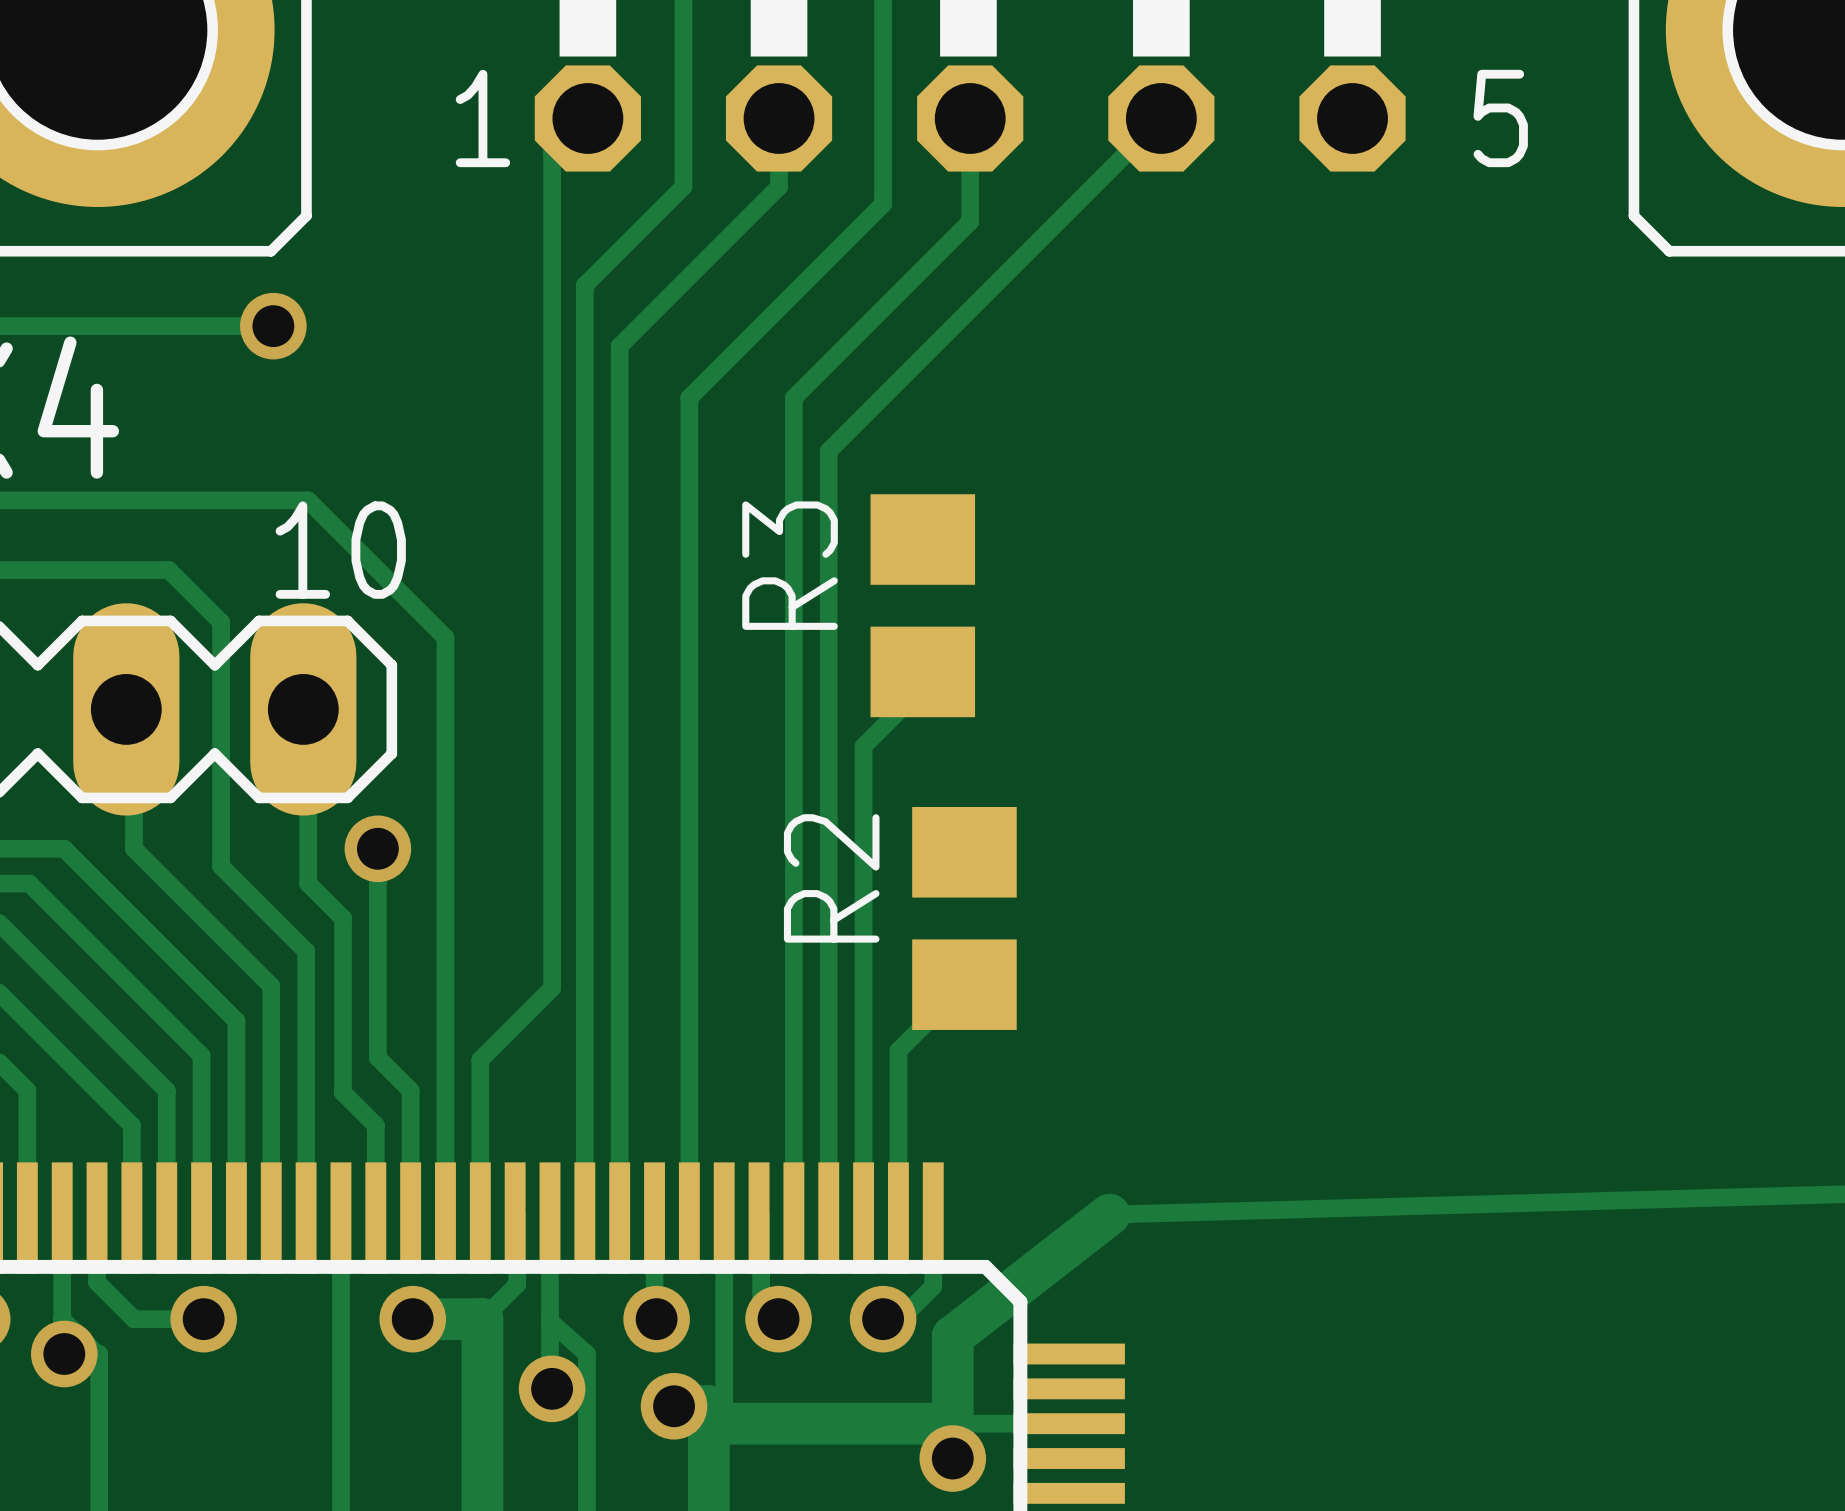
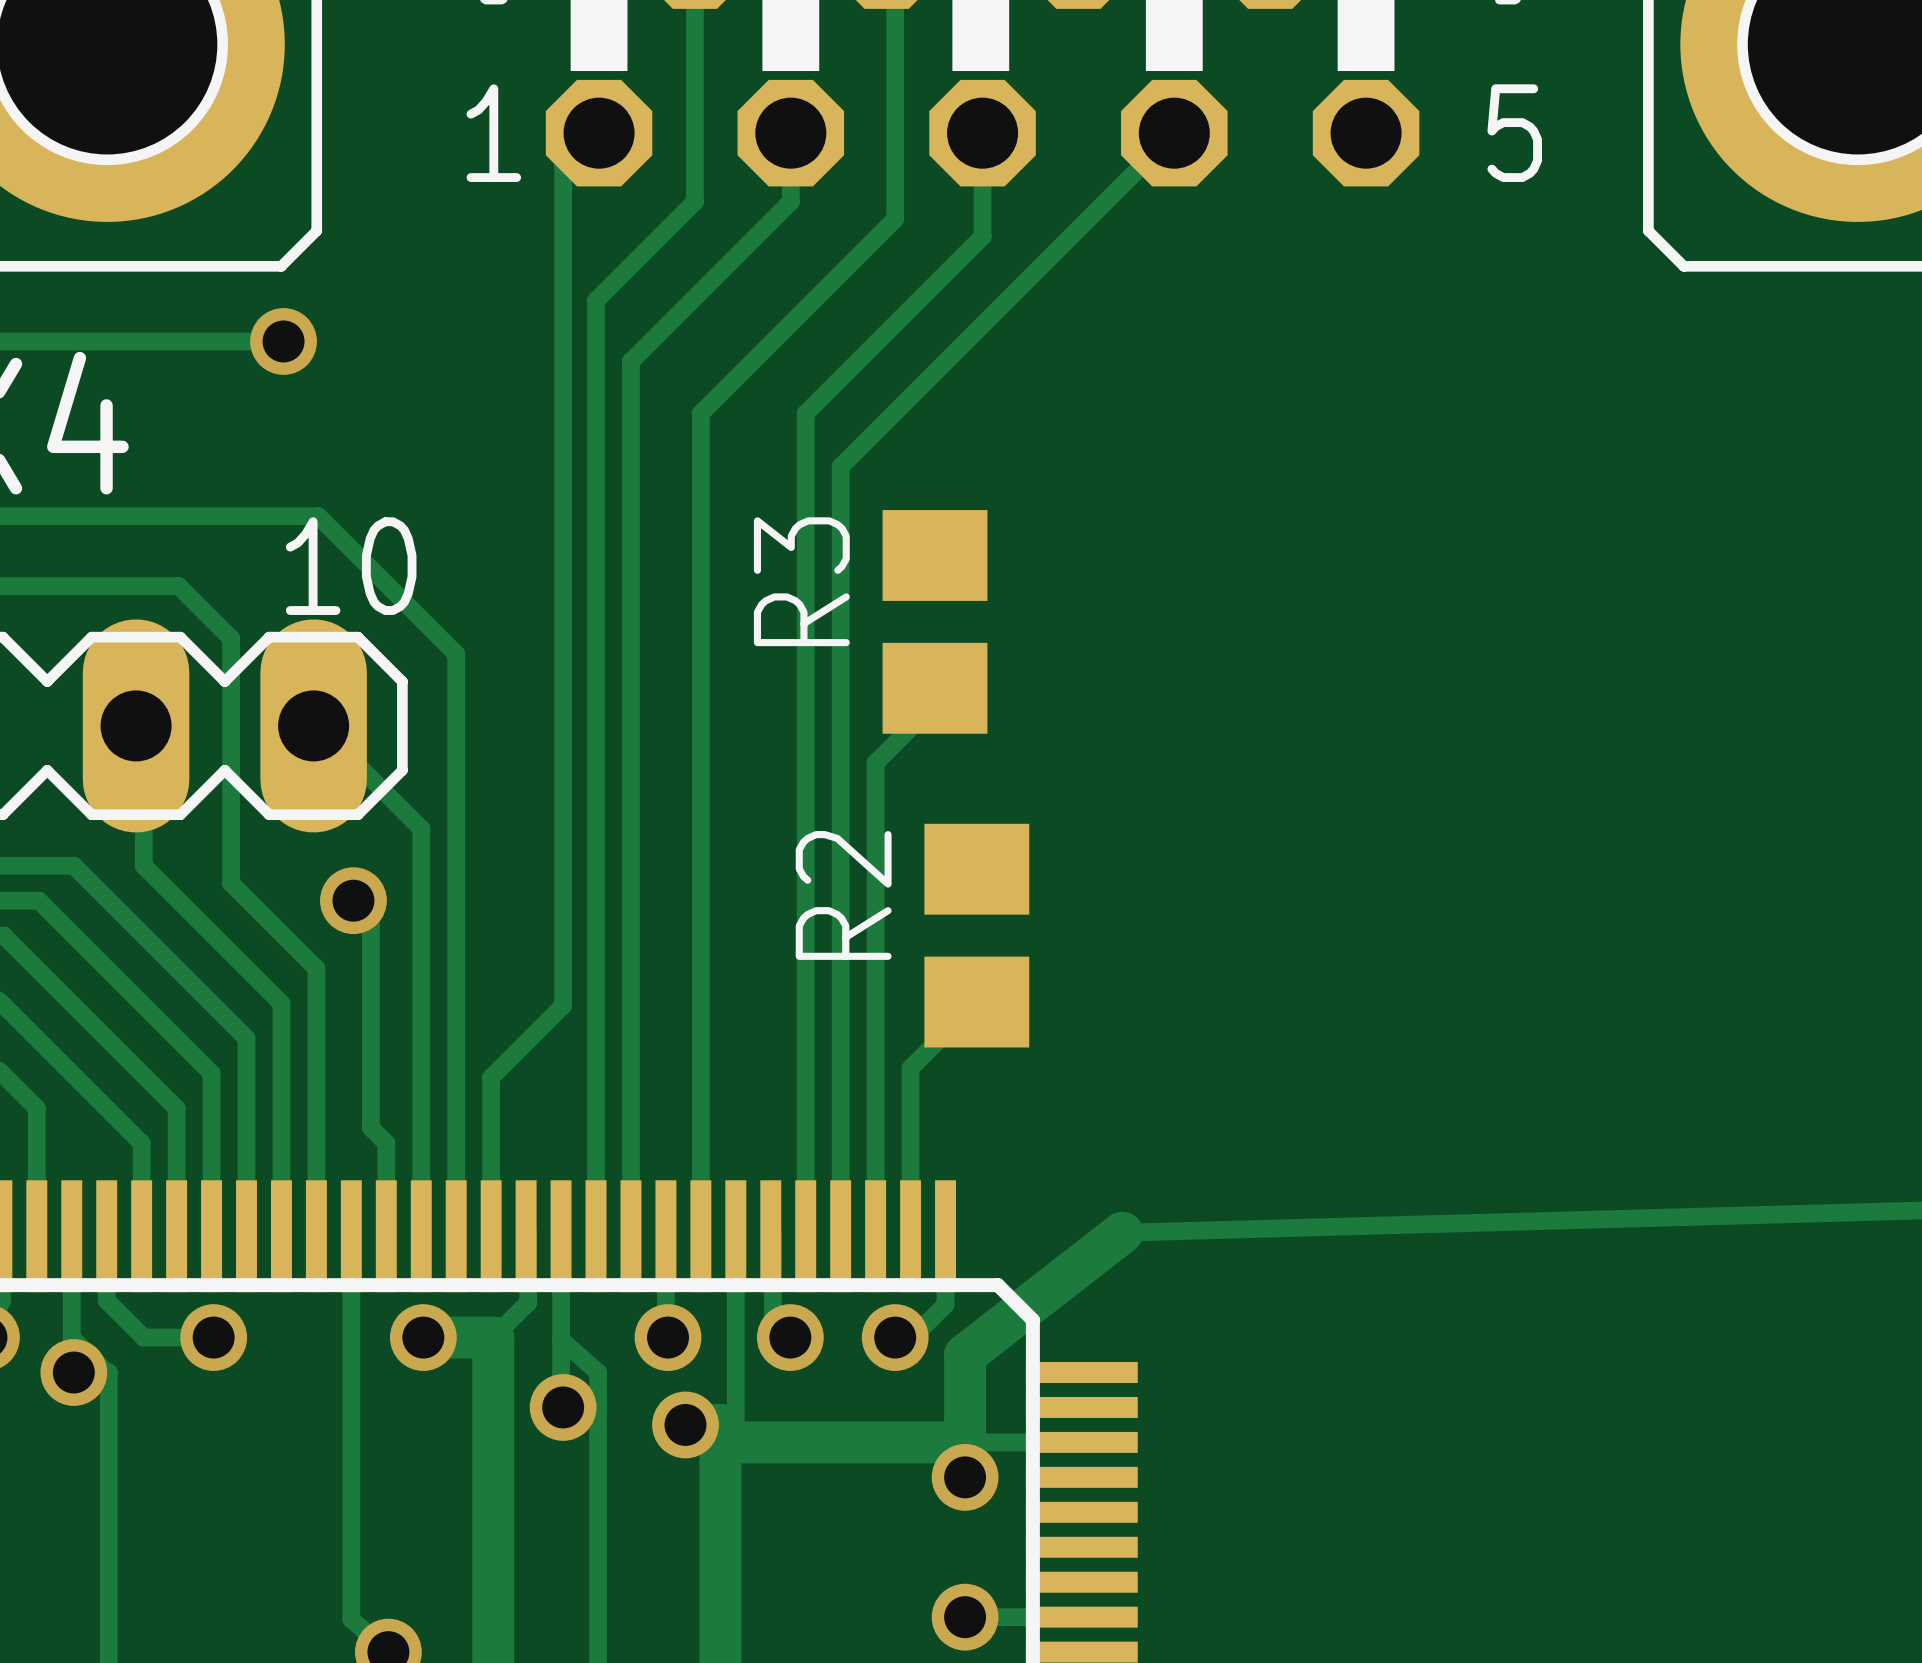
track: (308, 709) (308, 883) (343, 918) (343, 1092) (360, 1110) -> (318, 725) (421, 828) (421, 1108)
track: (377, 848) (377, 1057) (410, 1090) -> none
via position: (377, 848) -> (353, 900)
track: none -> (353, 900) (370, 918) (370, 1127)

